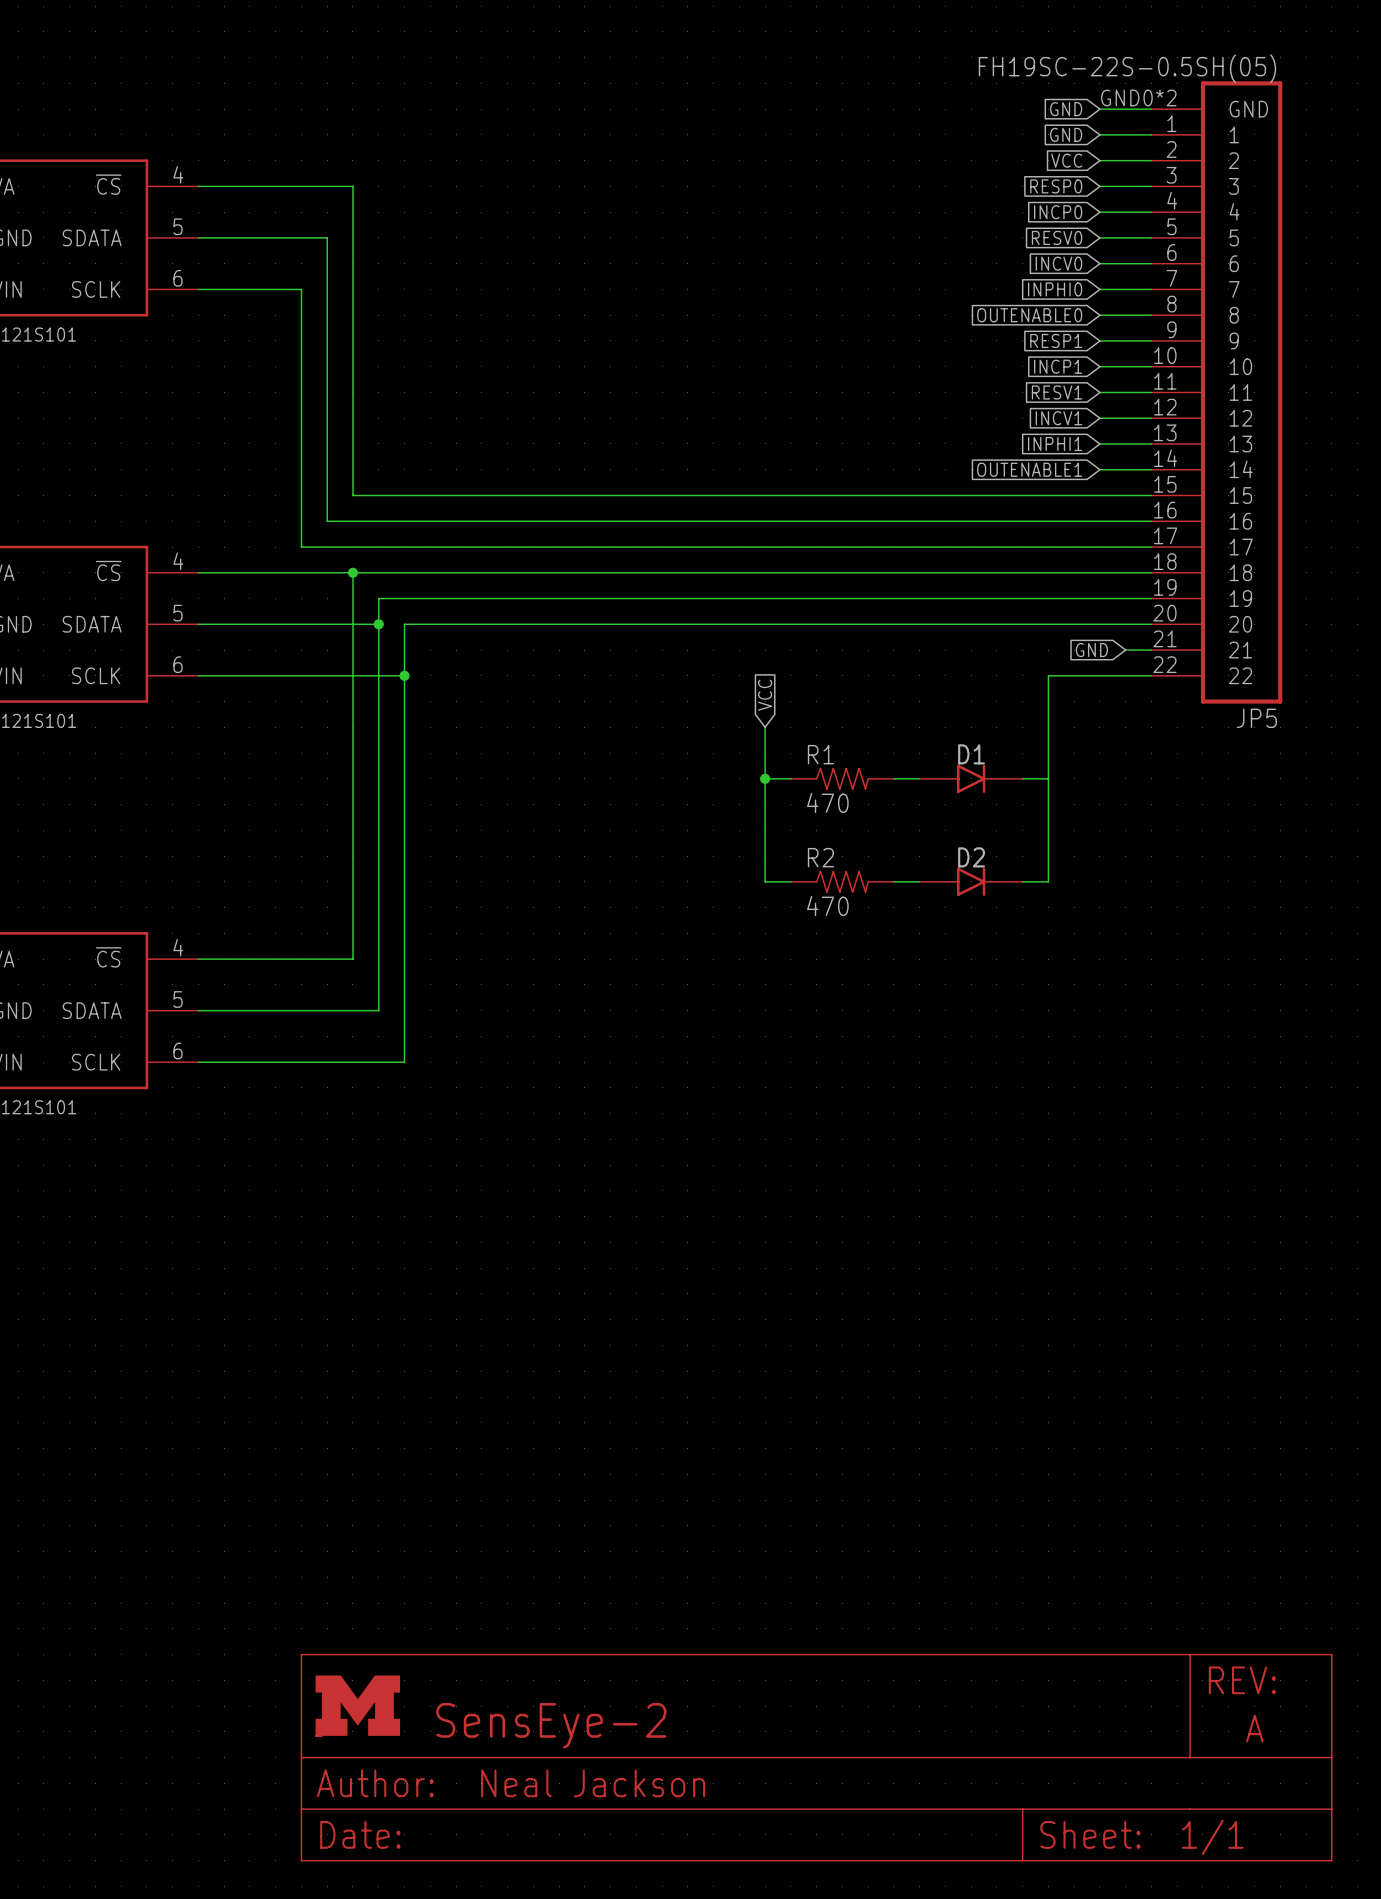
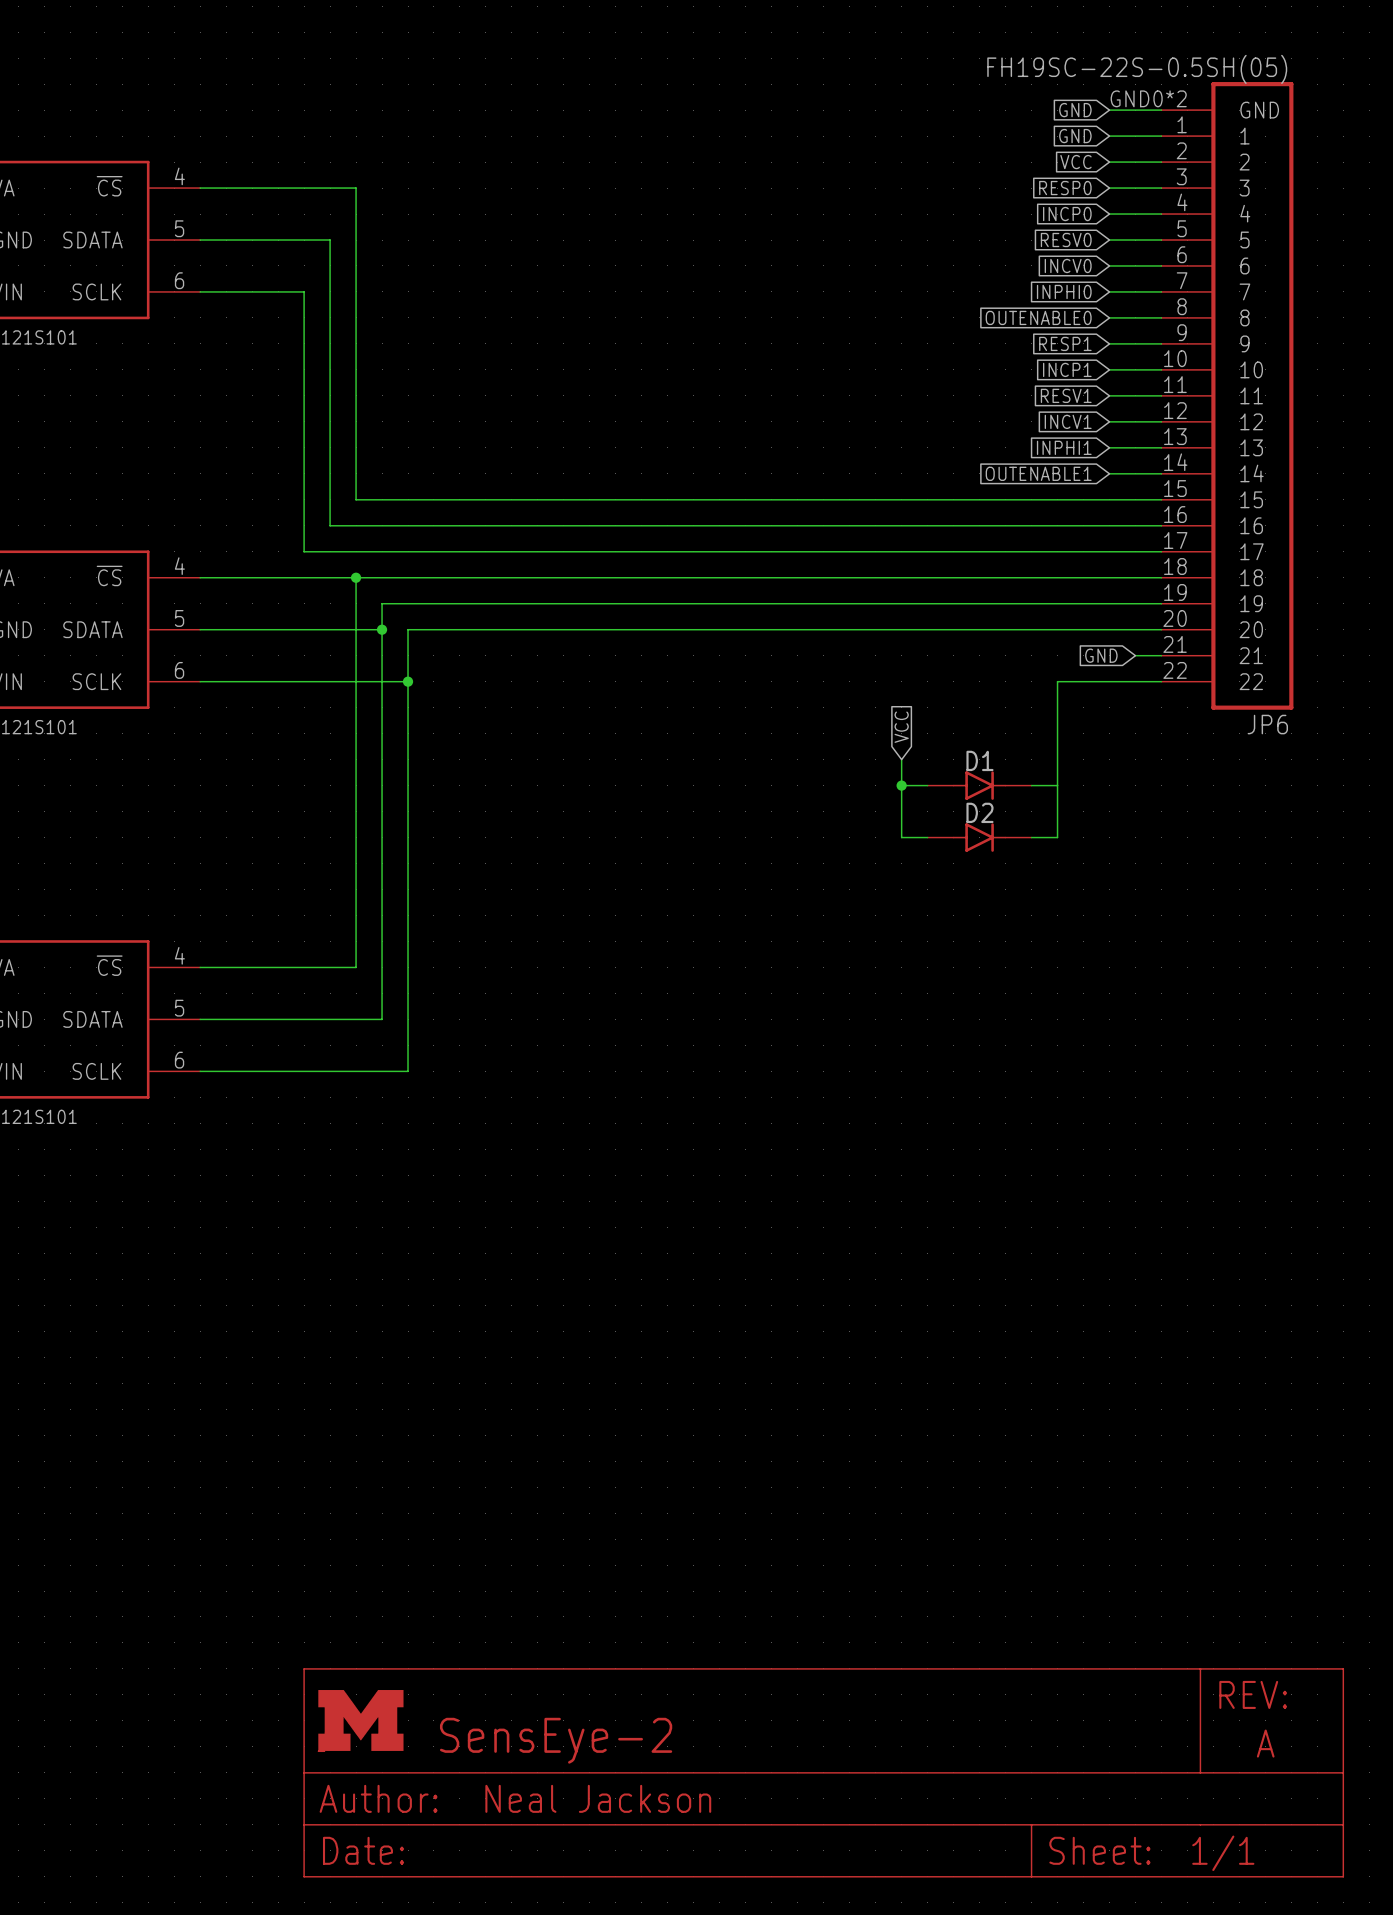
global label position: VCC (765, 695) -> VCC (901, 727)
JP5 name: JP5 (1256, 718) -> JP6 (1267, 724)
wire: (765, 727) (765, 881) (790, 881) -> none
wire: none -> (901, 759) (901, 837) (927, 837)
wire: (765, 778) (790, 778) -> none
junction: (765, 778) -> none
R1: 470 (842, 778) -> none
junction: none -> (901, 785)
wire: (1048, 830) (1048, 881) (1022, 881) -> (1057, 837) (1031, 837)
R2: 470 (842, 881) -> none
wire: (893, 881) (919, 881) -> none
D2 position: (971, 881) -> (979, 837)

